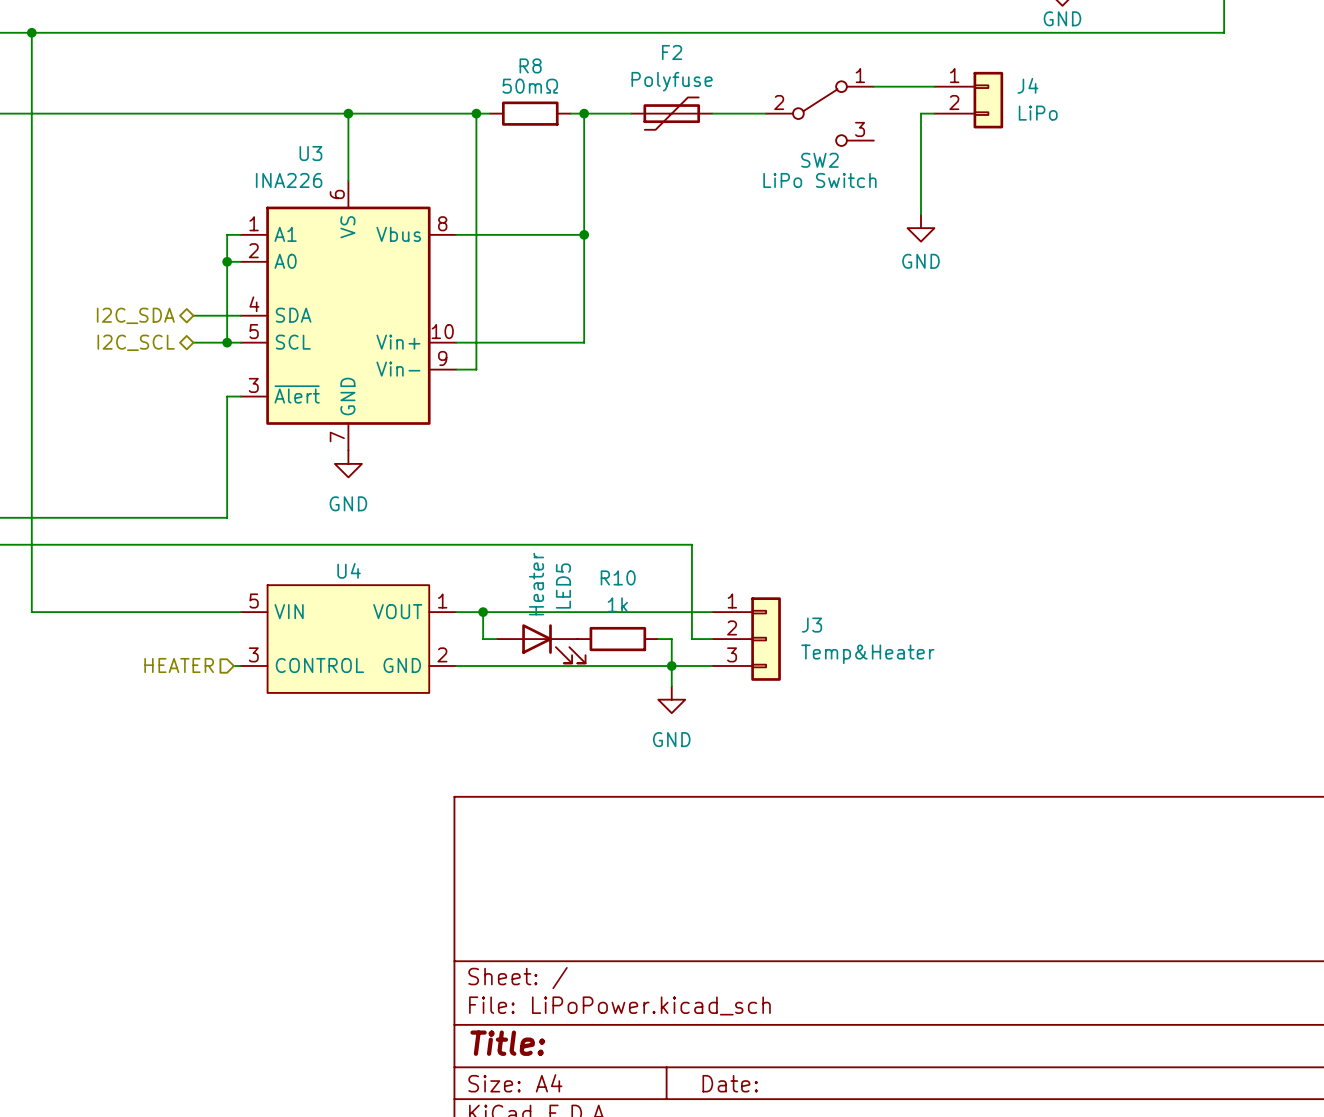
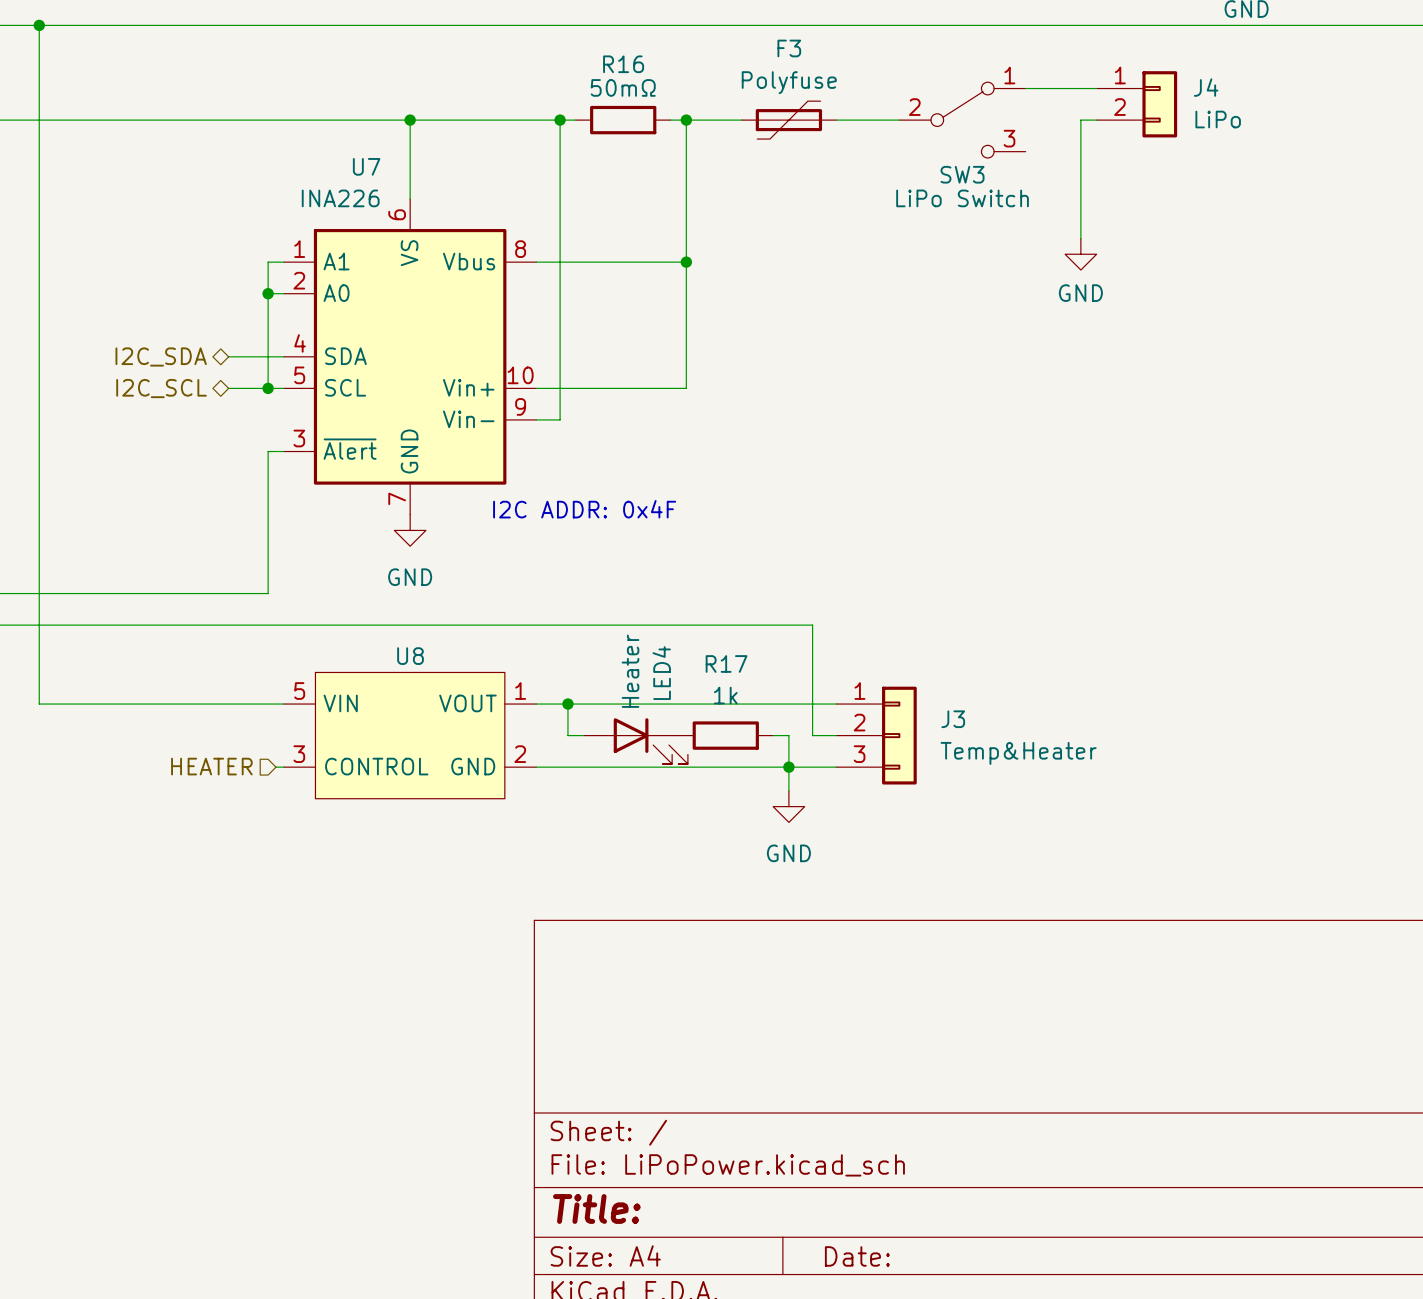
F2 name: F2 (672, 52) -> F3 (789, 48)
R8 name: R8 (530, 65) -> R16 (623, 64)
U3 name: U3 (310, 153) -> U7 (366, 166)
SW2 name: SW2 (819, 160) -> SW3 (962, 174)
text: none -> I2C ADDR: 0x4F (584, 509)
U4 name: U4 (349, 570) -> U8 (410, 656)
R10 name: R10 (618, 577) -> R17 (726, 663)
LED5 name: LED5 (563, 586) -> LED4 (661, 673)

